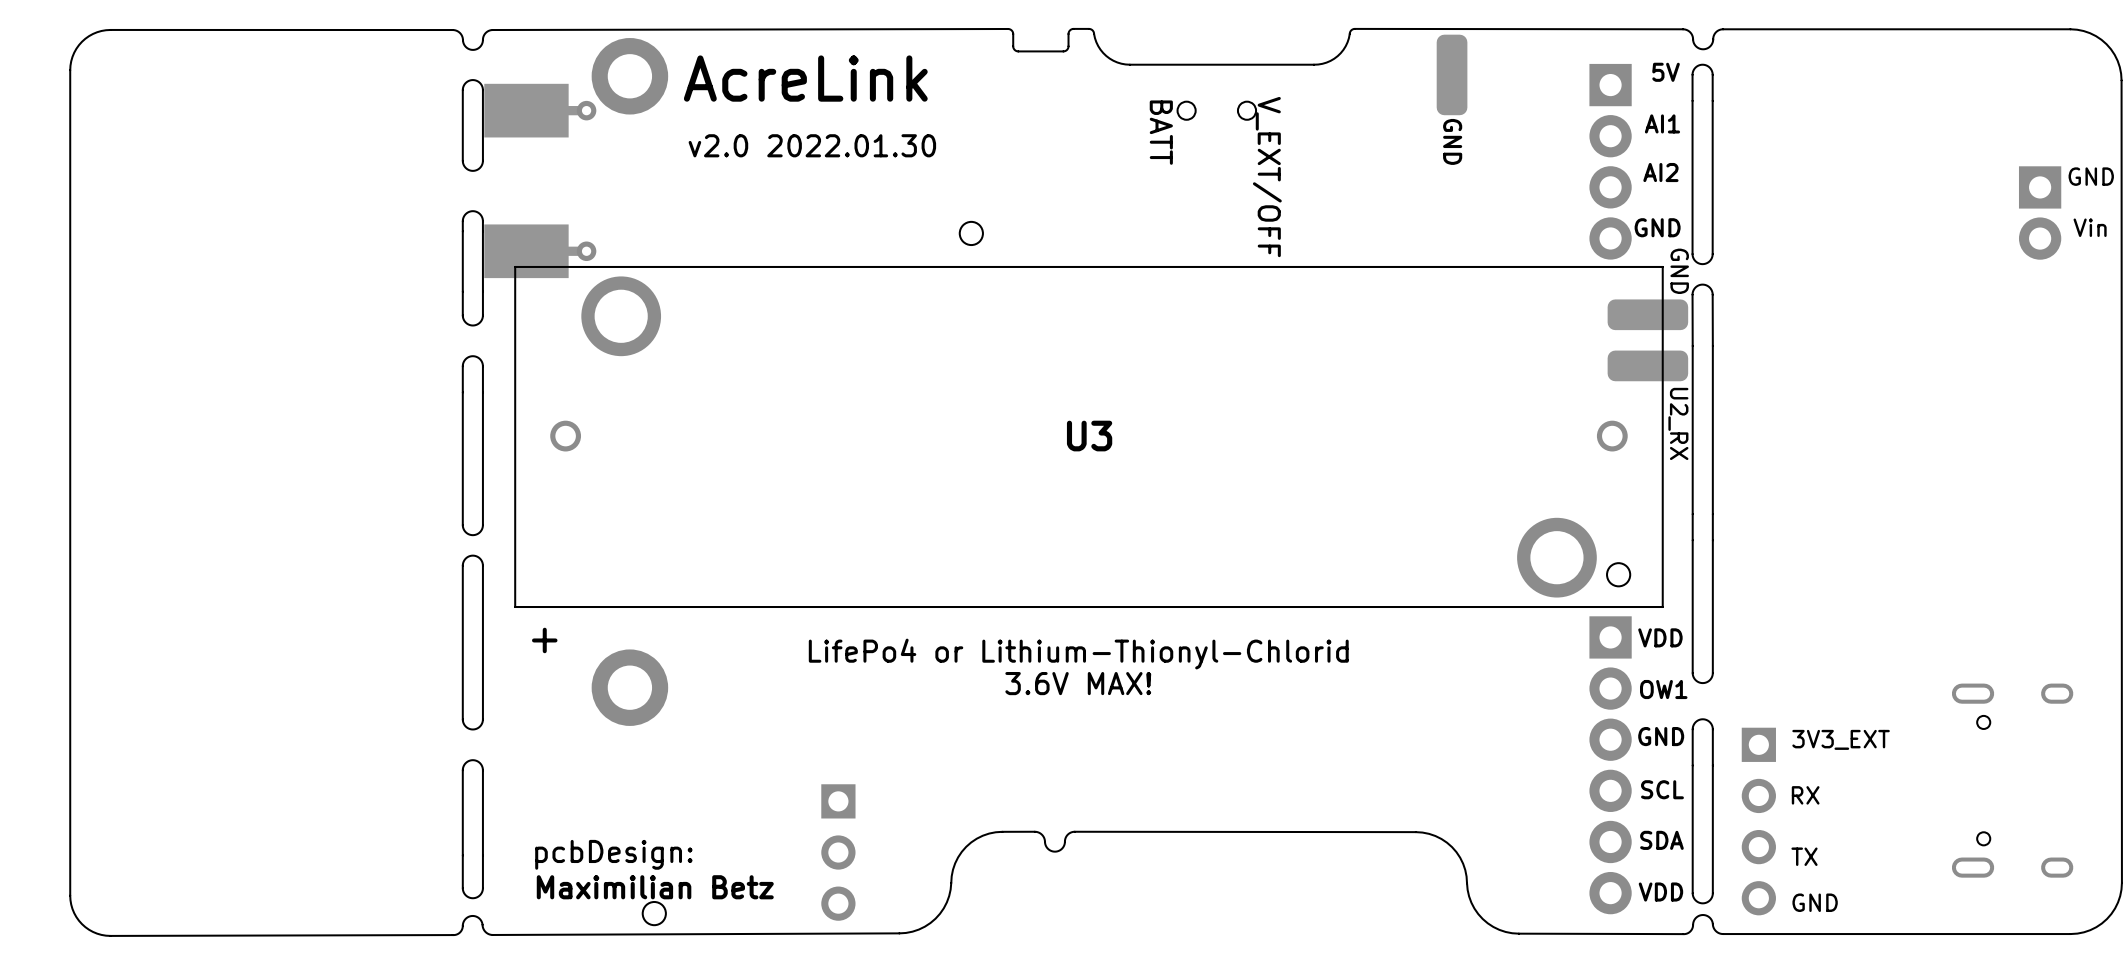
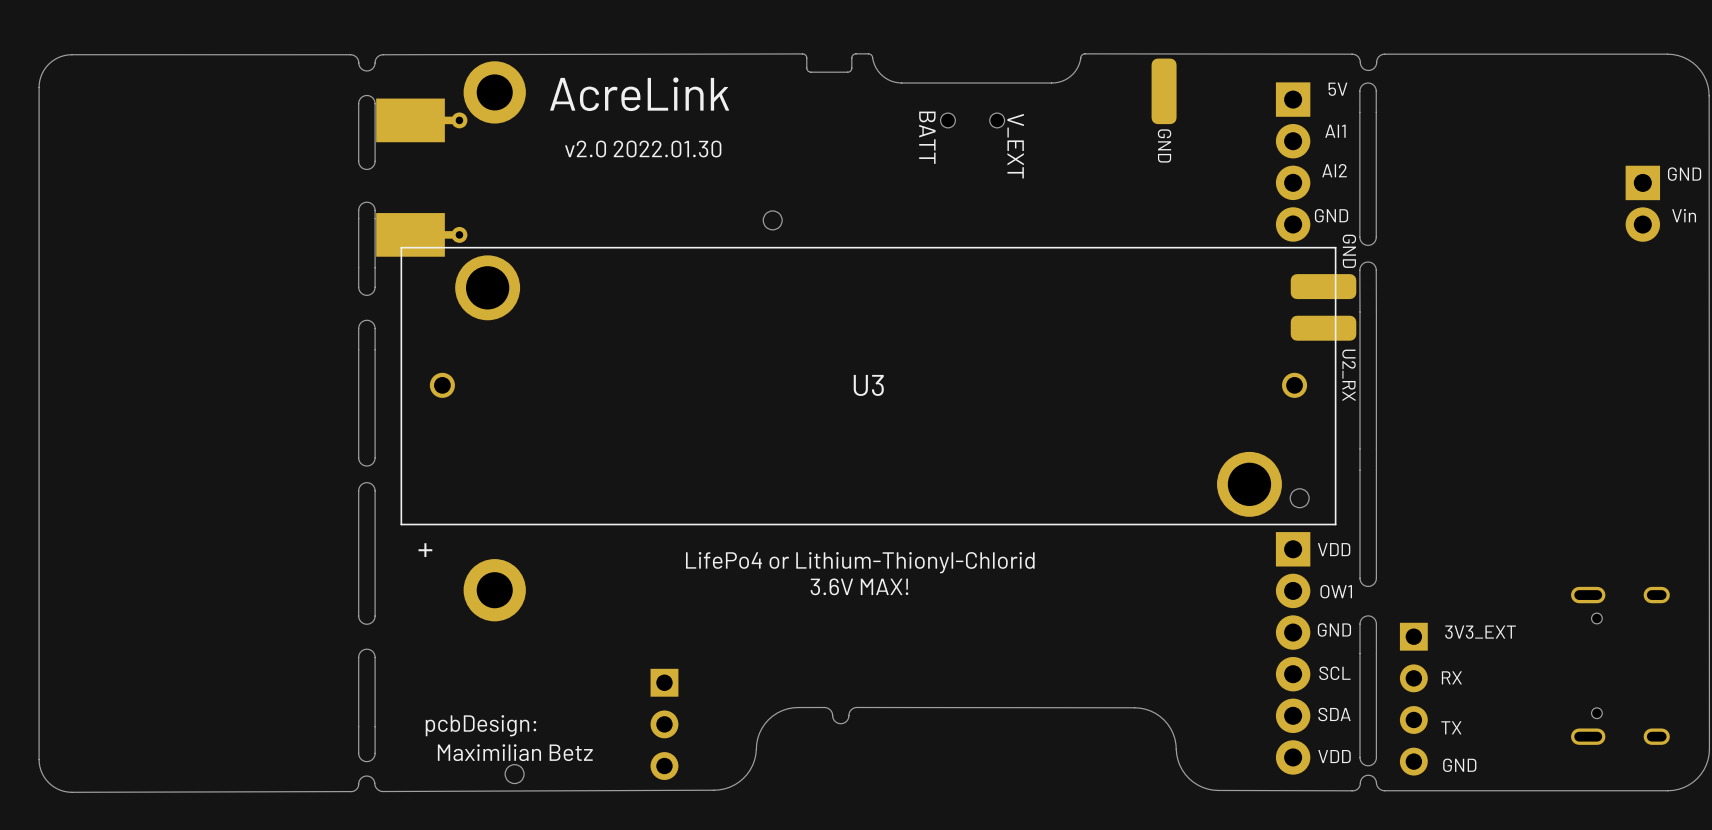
text: V_EXT/OFF (1267, 177) -> V_EXT (1015, 146)

